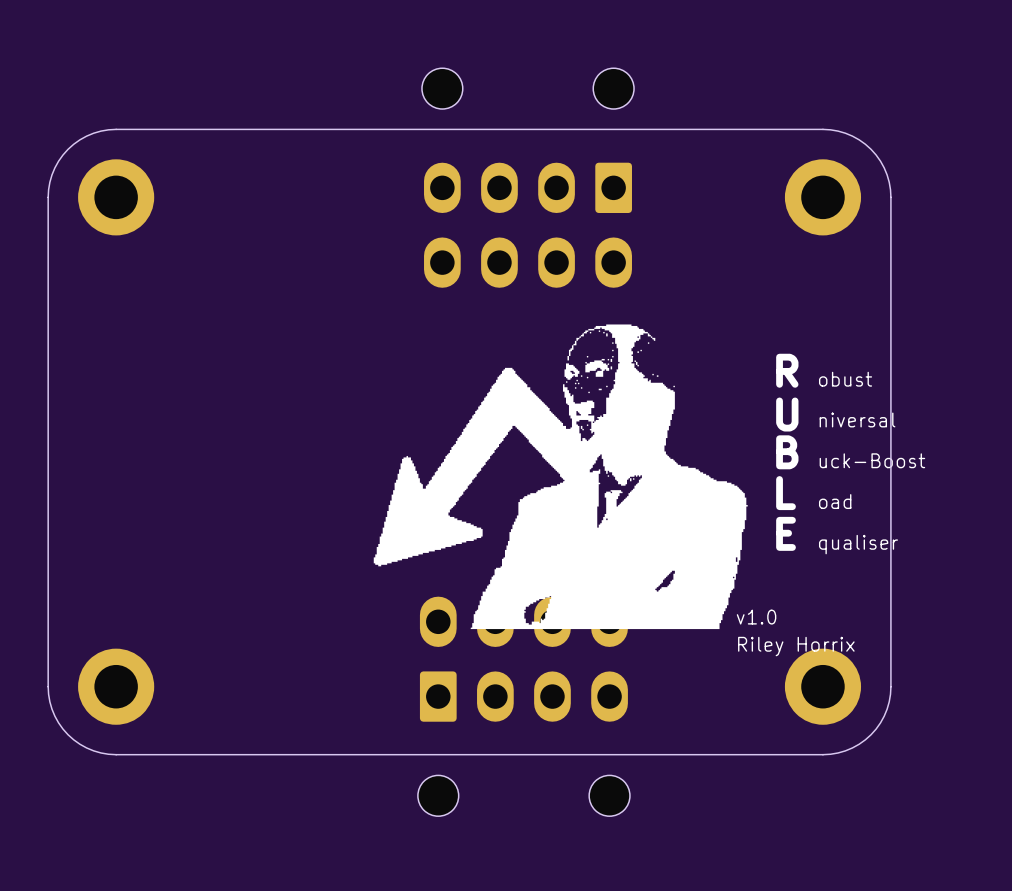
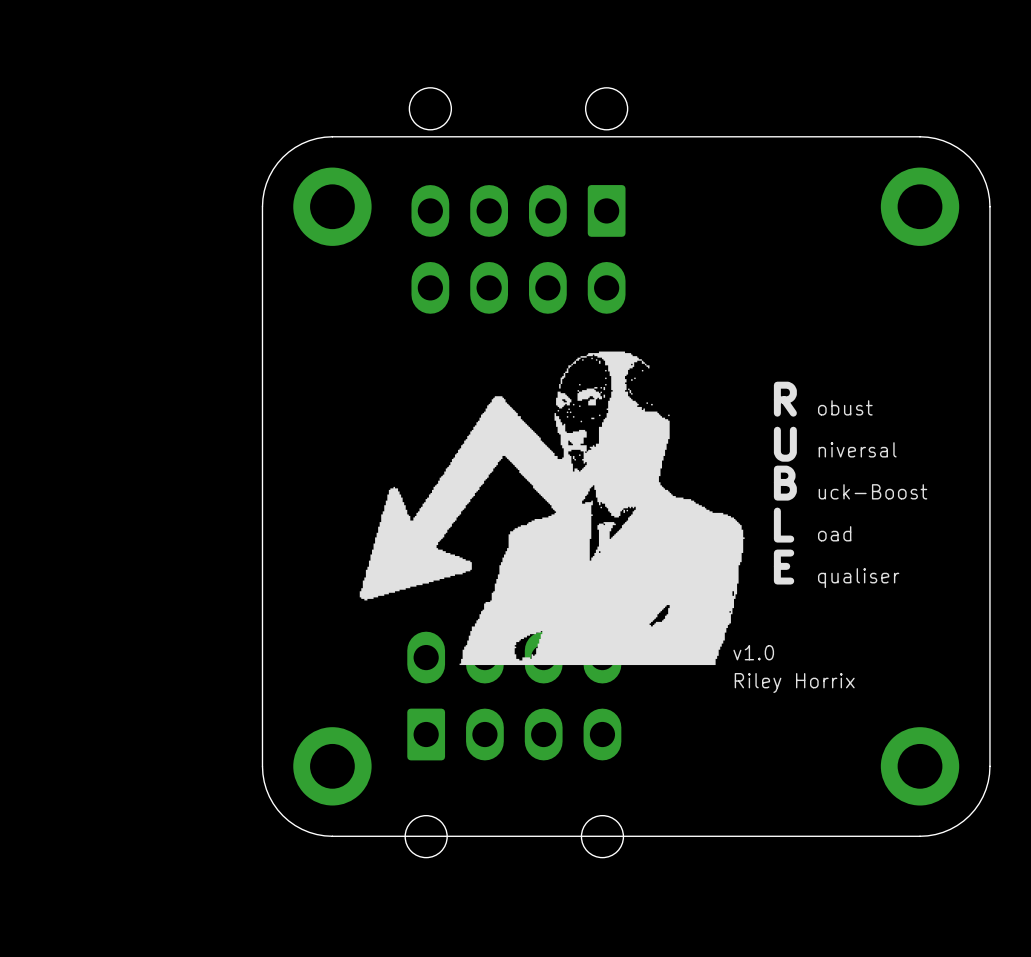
board edge: (822, 129) (116, 129) (93, 133) (73, 144) (63, 154) (54, 167) (49, 182) (48, 197) (48, 686) (51, 709) (63, 729) (73, 739) (86, 747) (101, 752) (116, 754) (822, 754) (845, 750) (865, 739) (876, 729) (884, 716) (889, 701) (890, 686) (890, 189) (887, 174) (880, 161) (865, 144) (845, 133) (822, 129) -> (920, 136) (935, 138) (950, 143) (969, 157) (983, 176) (989, 198) (989, 766) (986, 789) (979, 803) (969, 815) (957, 825) (943, 832) (920, 836) (332, 836) (316, 834) (302, 829) (282, 815) (269, 796) (264, 781) (262, 766) (262, 206) (266, 183) (273, 169) (282, 157) (302, 143) (316, 138) (332, 136) (920, 136)
part position: (116, 197) -> (332, 206)
part position: (822, 197) -> (920, 206)
part position: (116, 686) -> (332, 766)
part position: (822, 686) -> (920, 766)

